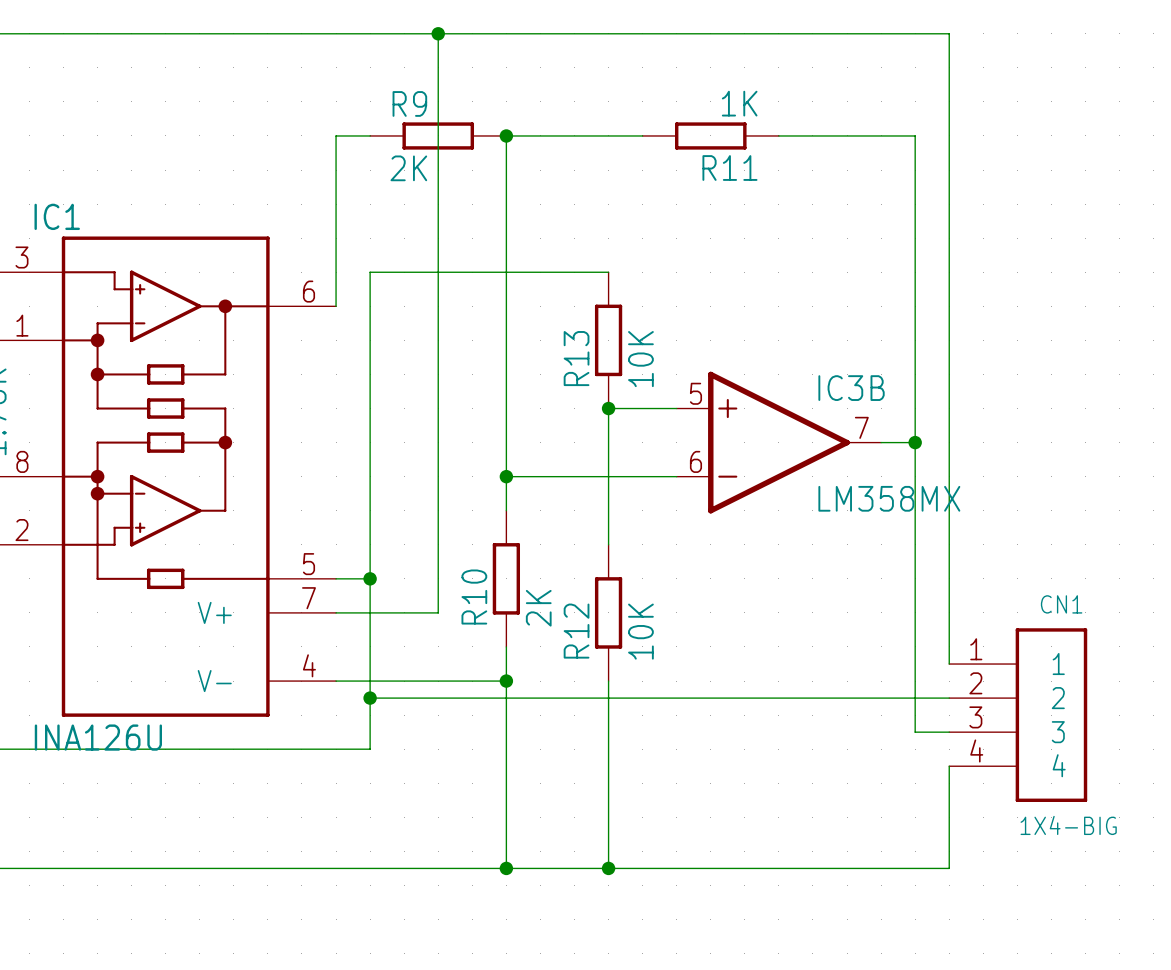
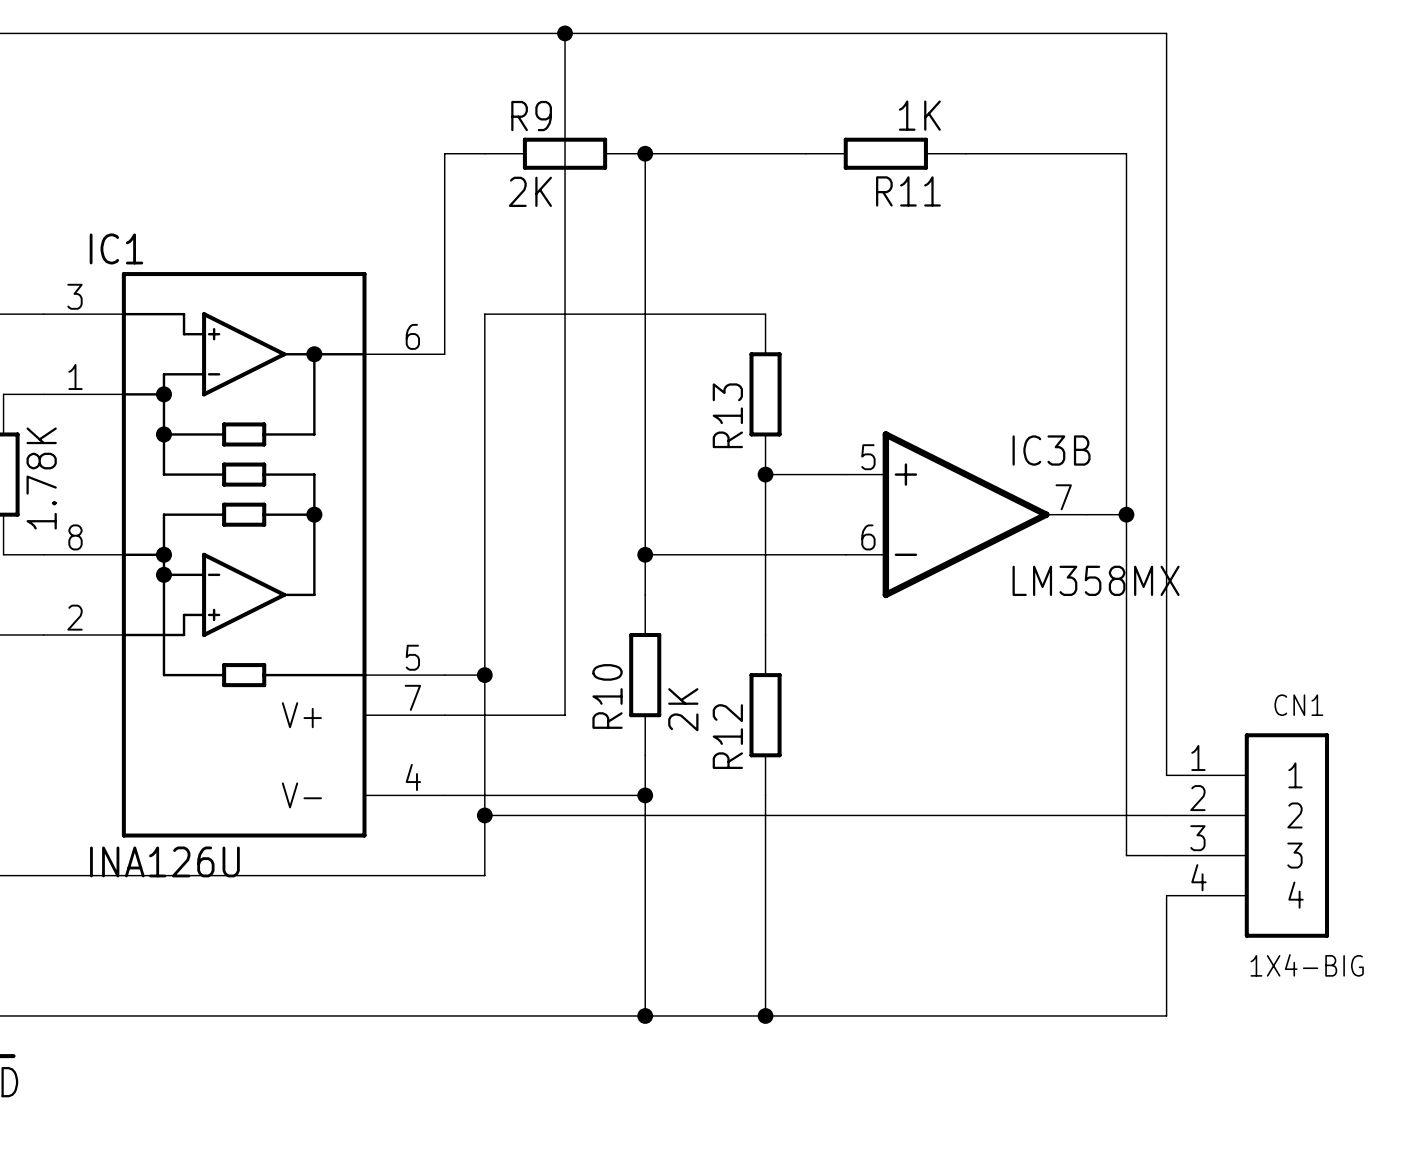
R13 value: 10K (640, 359) -> none
R12 value: 10K (640, 631) -> none

